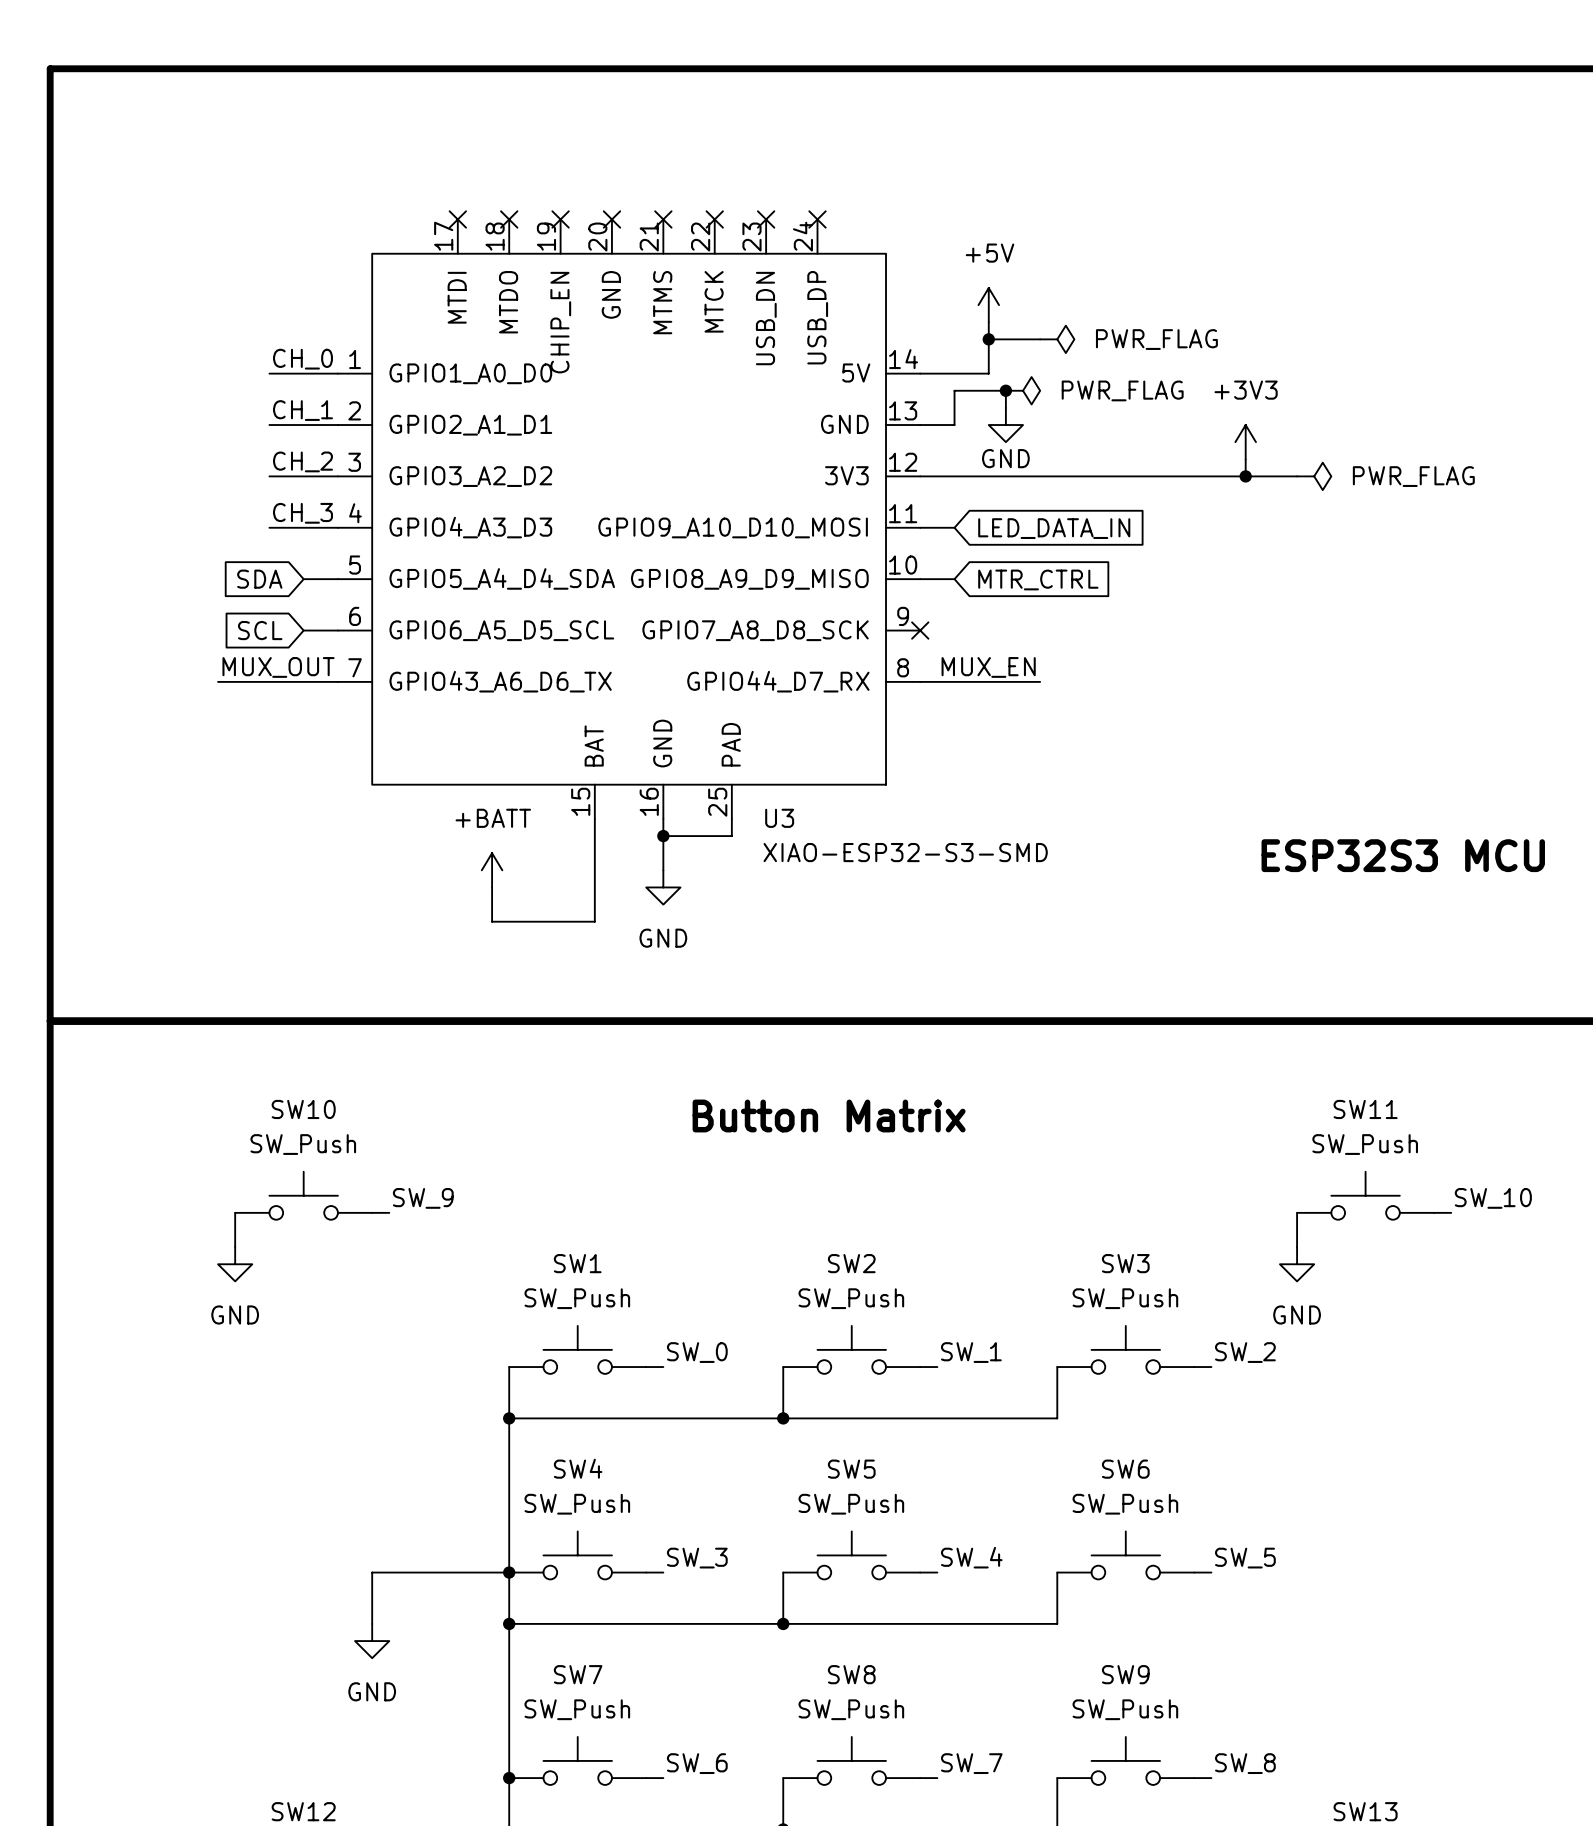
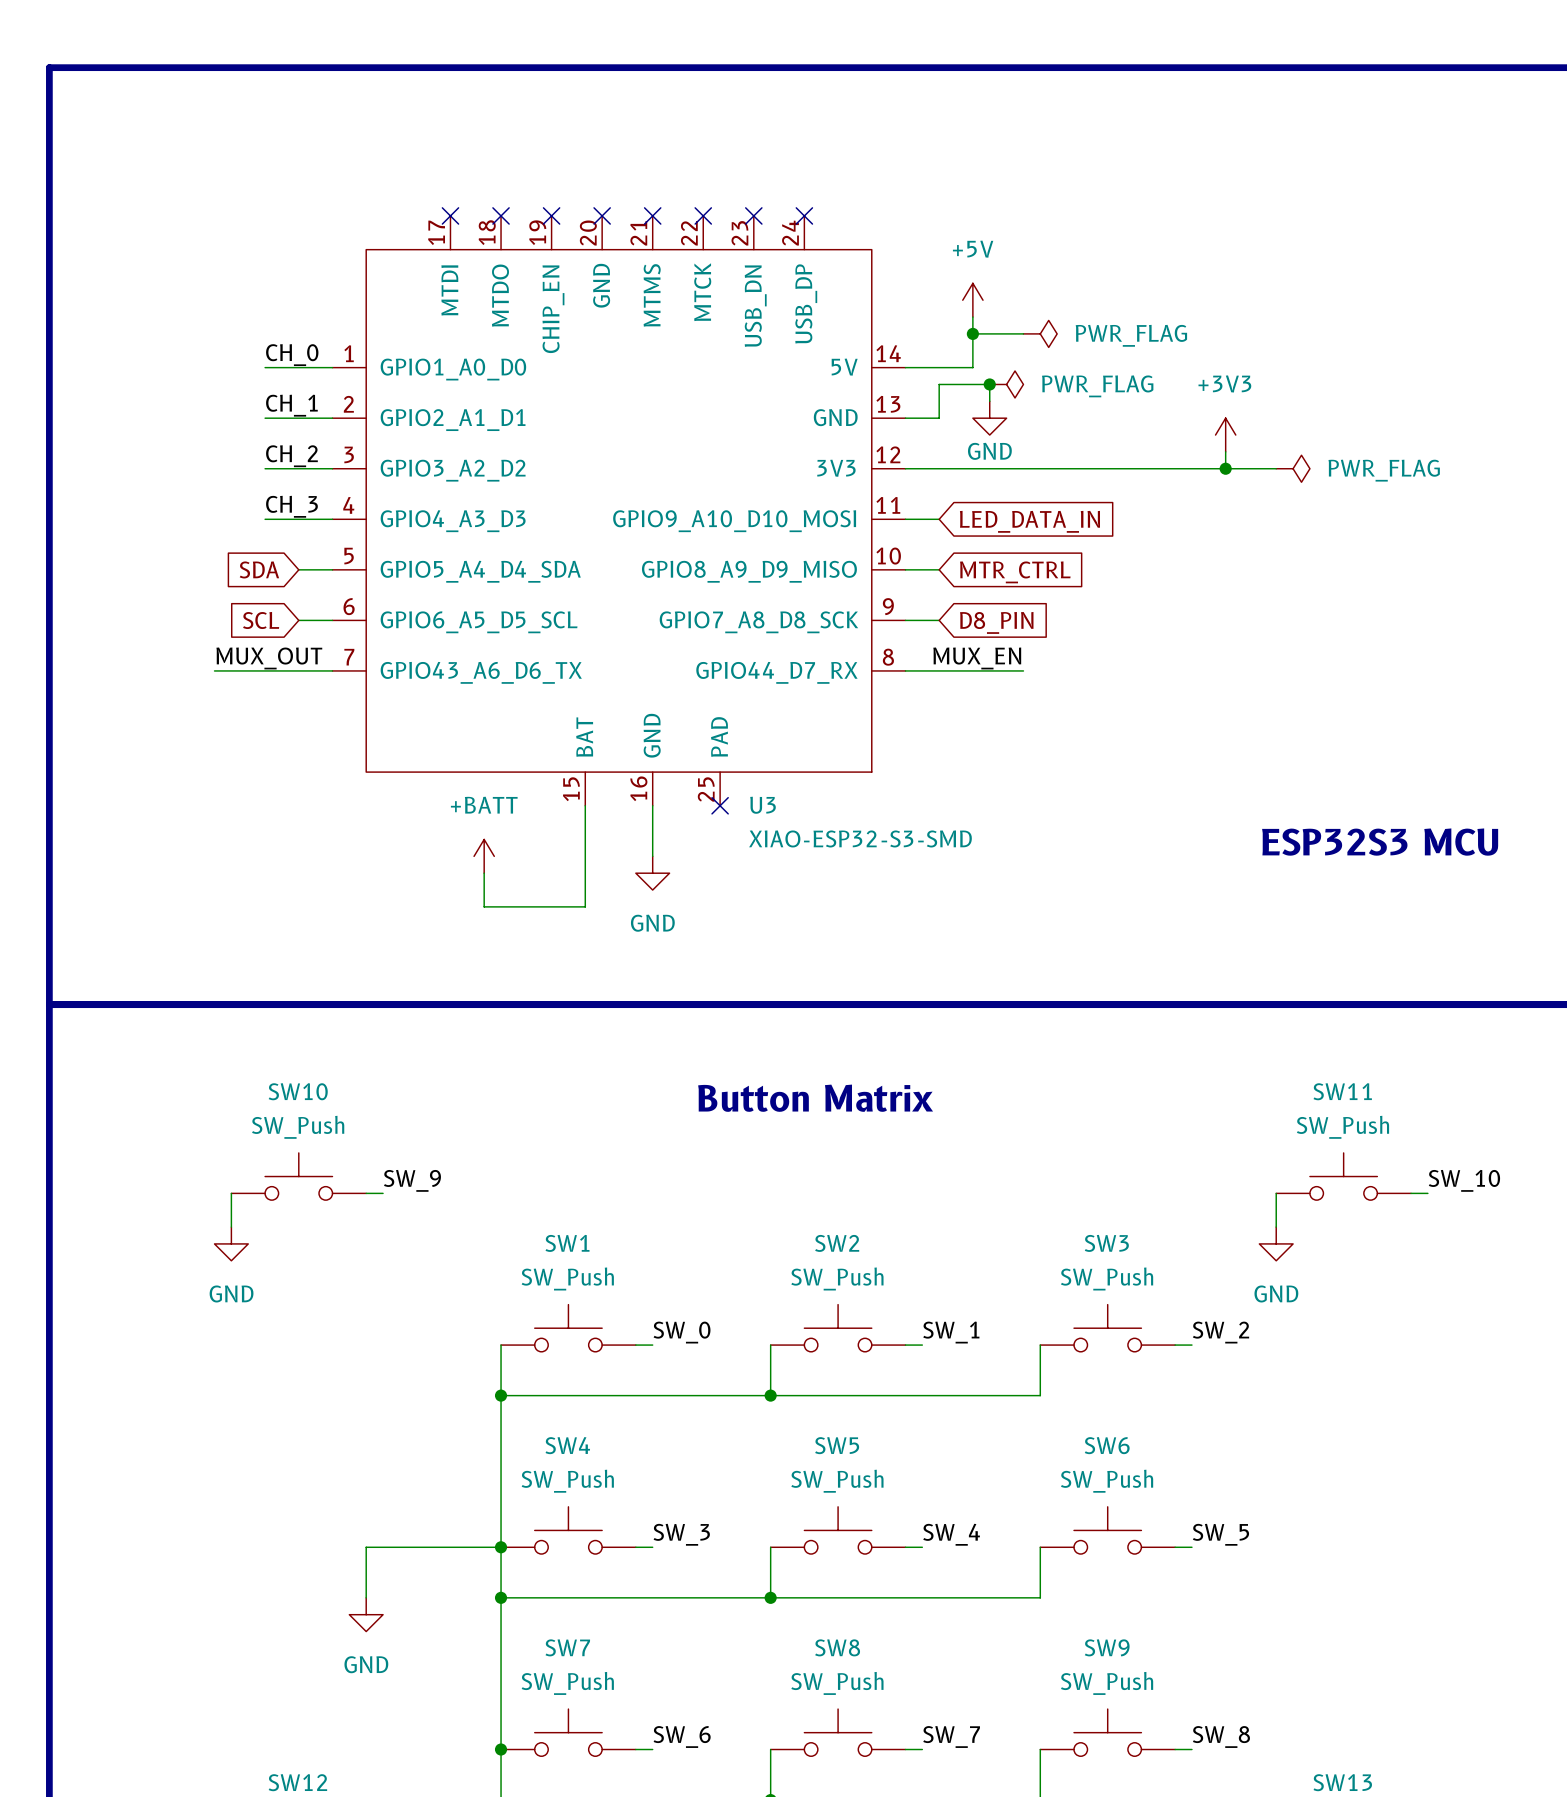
wire: none -> (905, 620) (939, 620)
no-connect mark: (920, 630) -> none
global label: none -> D8_PIN (996, 622)
wire: (731, 818) (731, 836) (663, 836) -> none
no-connect mark: none -> (720, 805)
junction: (663, 836) -> none

